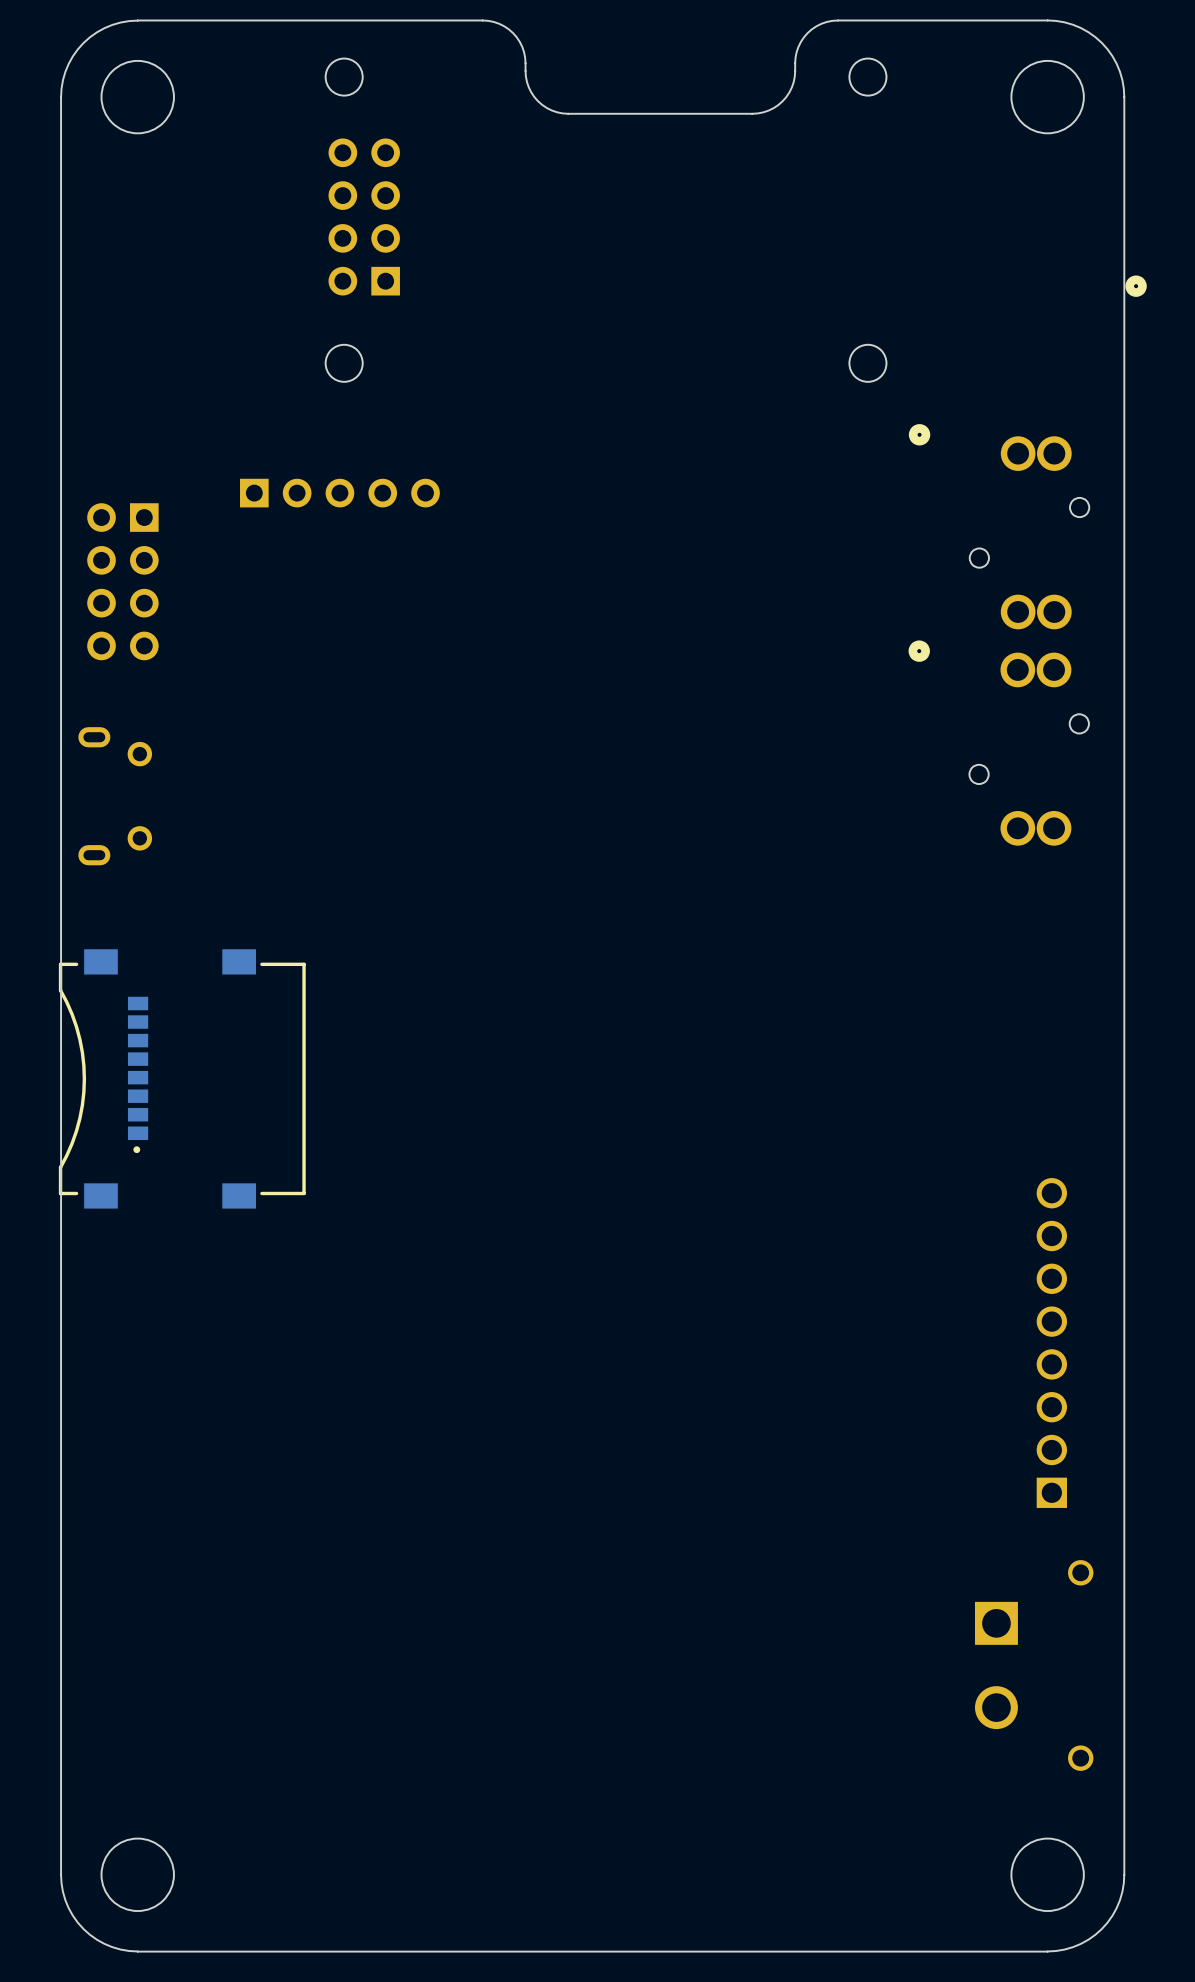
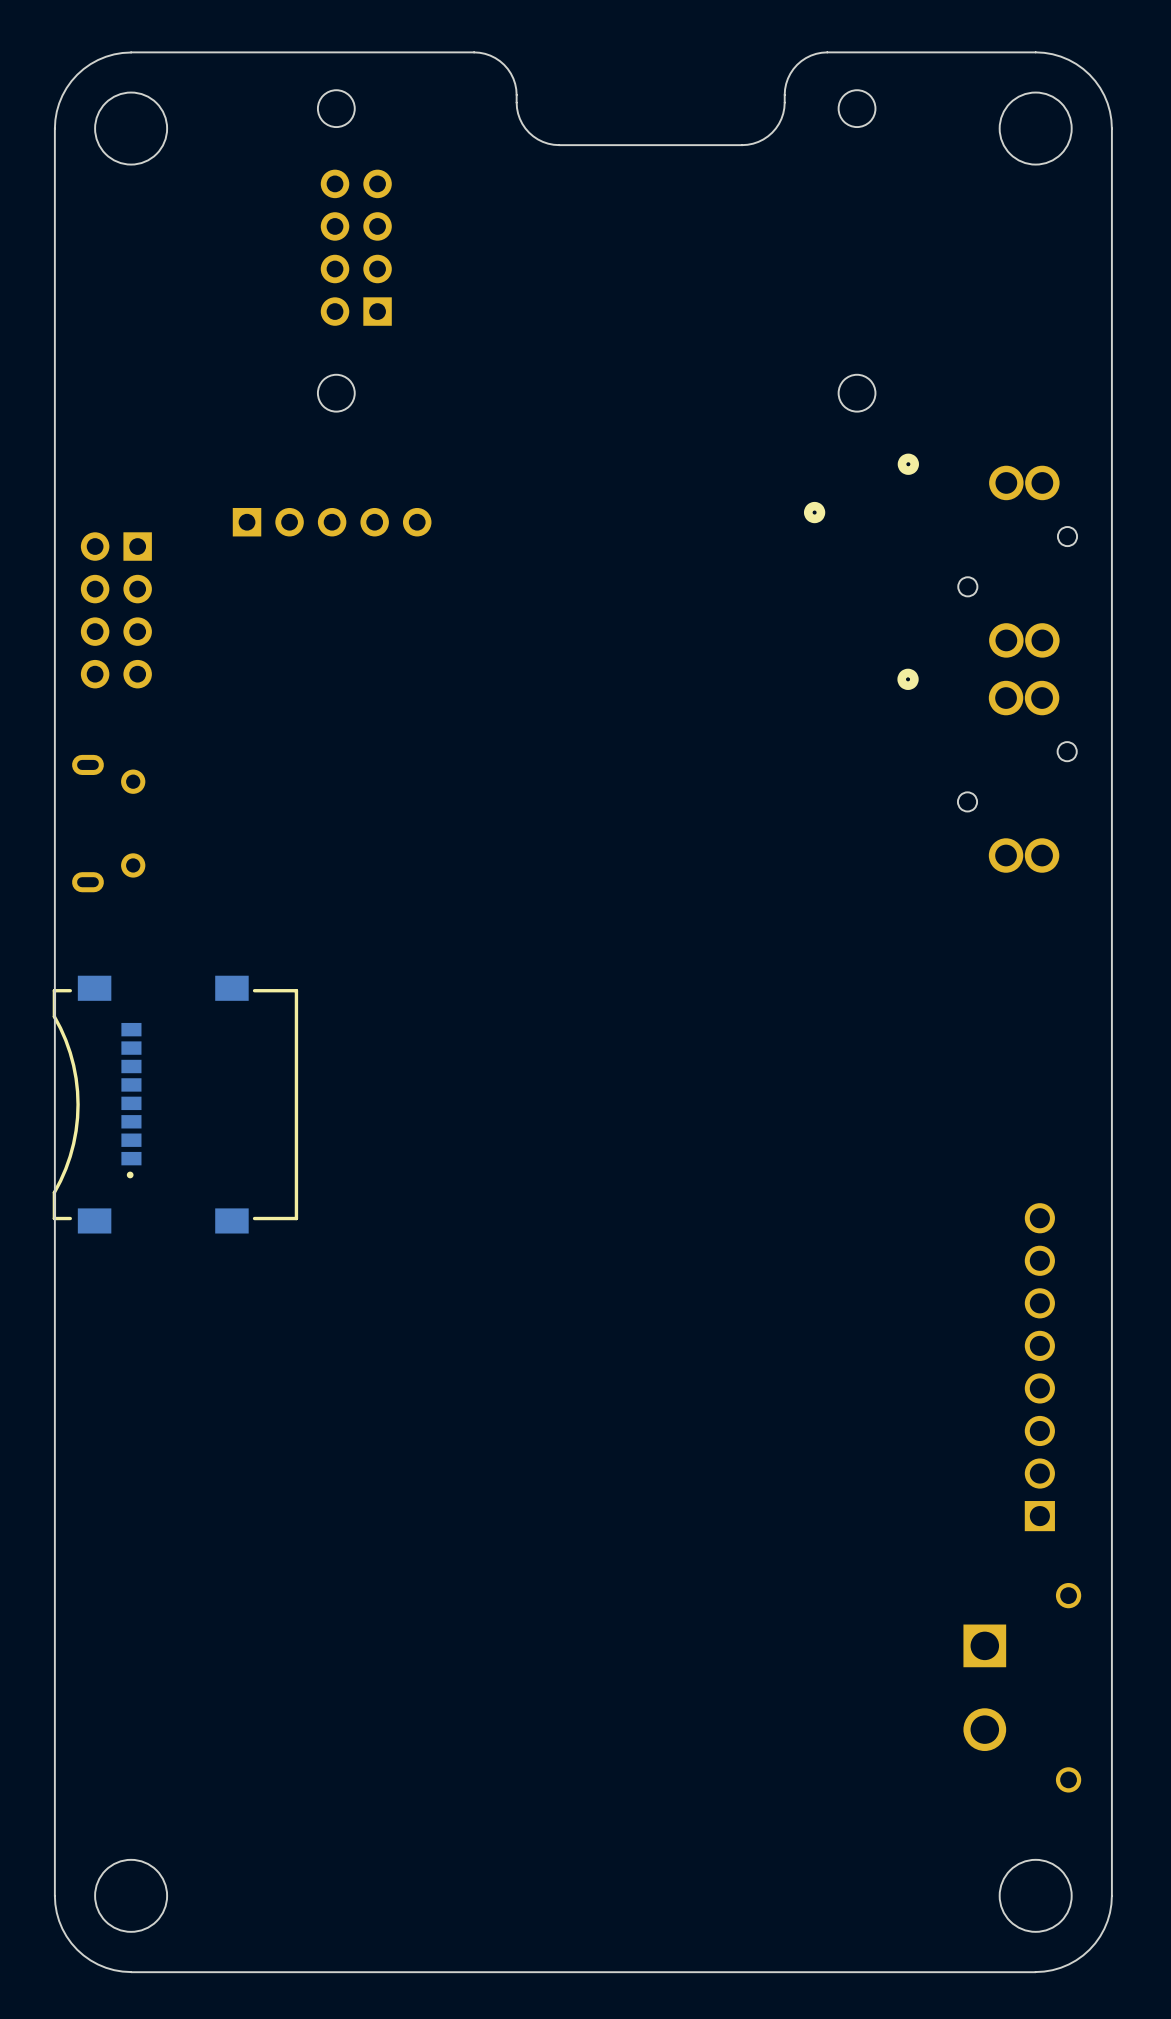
part position: (1136, 286) -> (814, 512)

